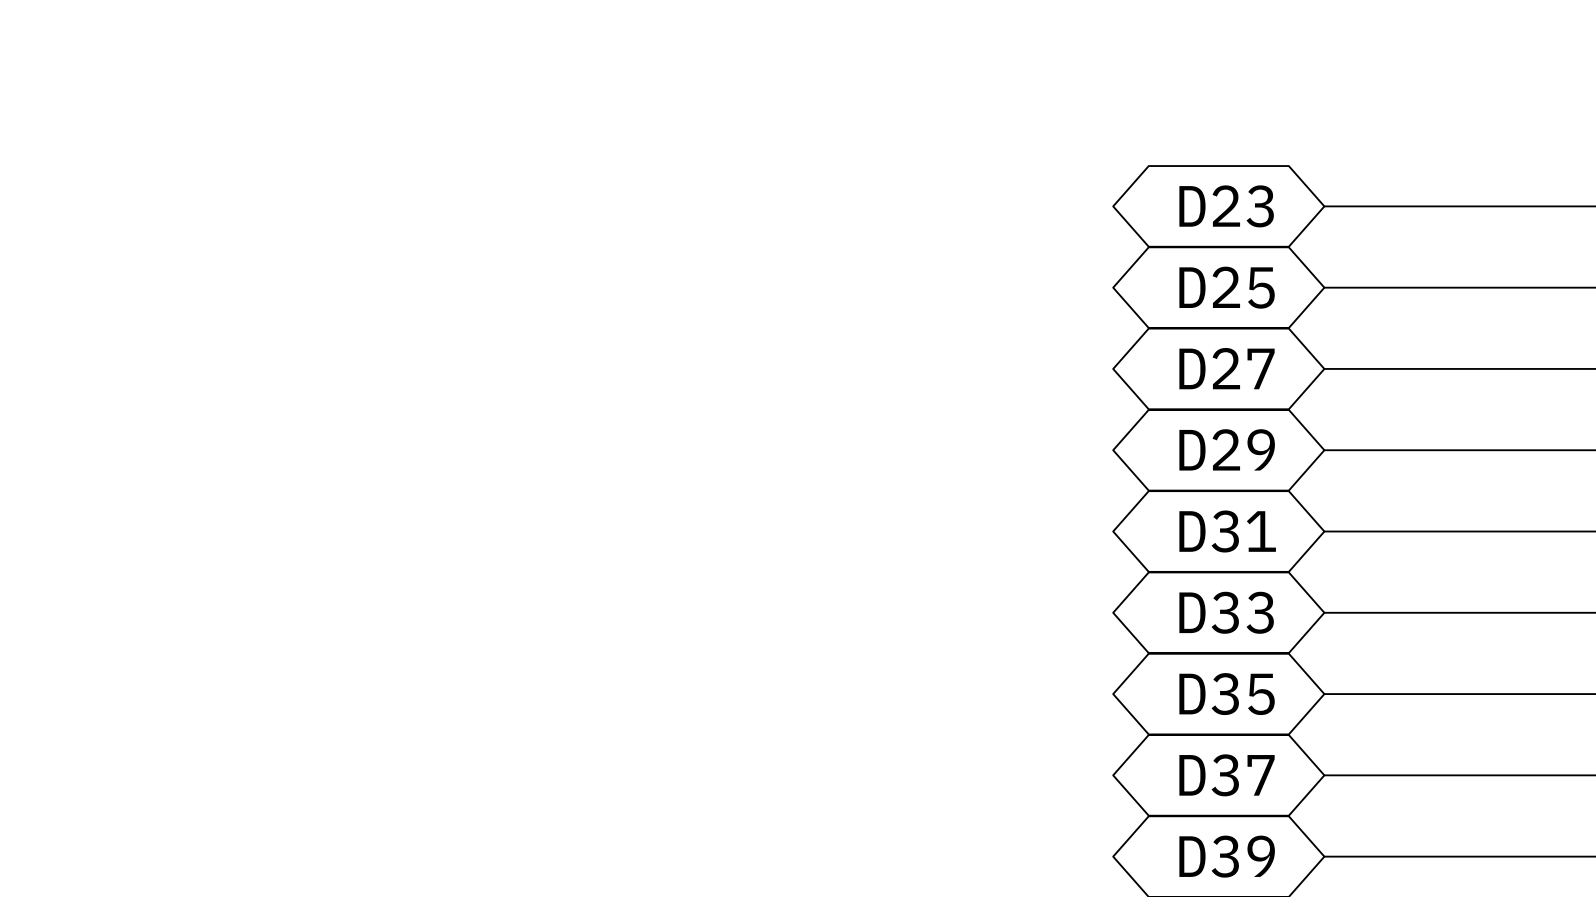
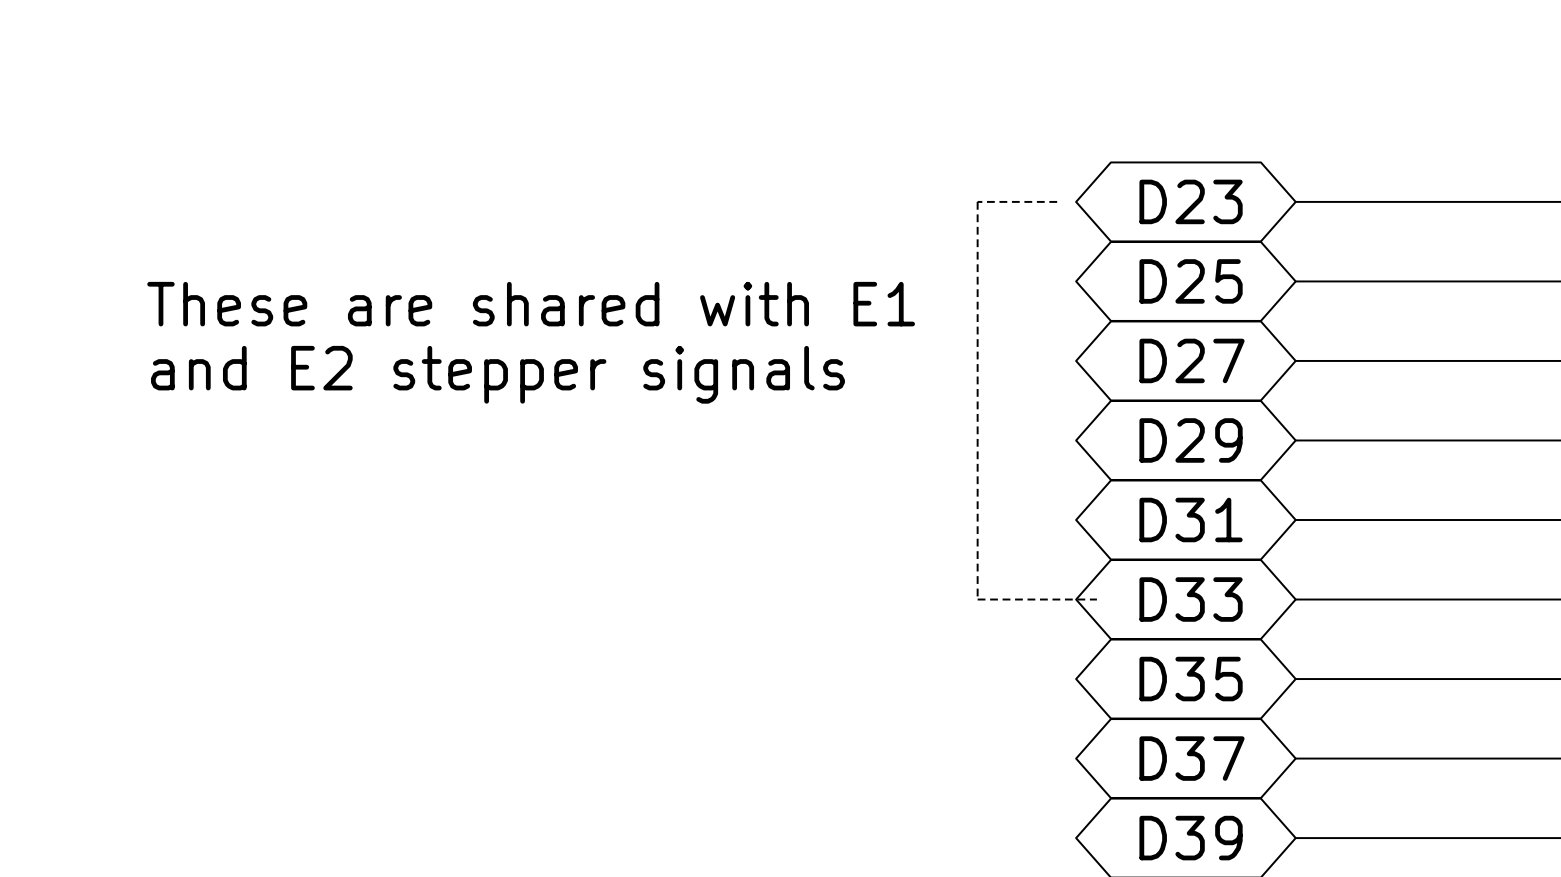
line: none -> (1057, 201) (977, 201) (977, 599) (1096, 599)
text: none -> These are shared with E1 (531, 304)
text: none -> and E2 stepper signals (497, 374)

